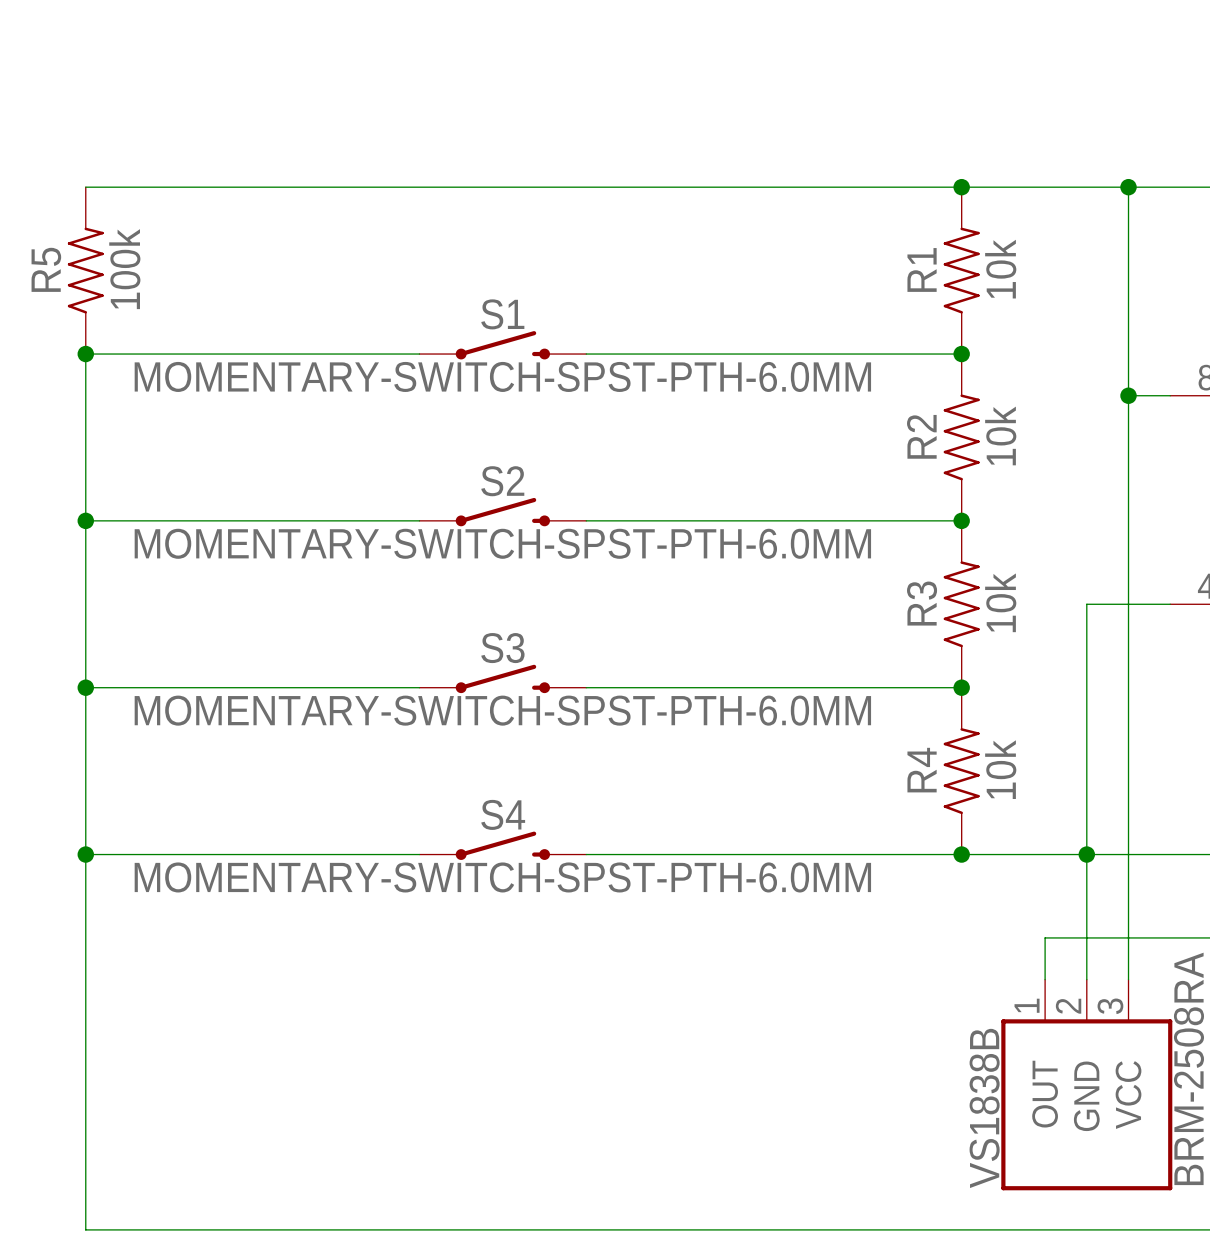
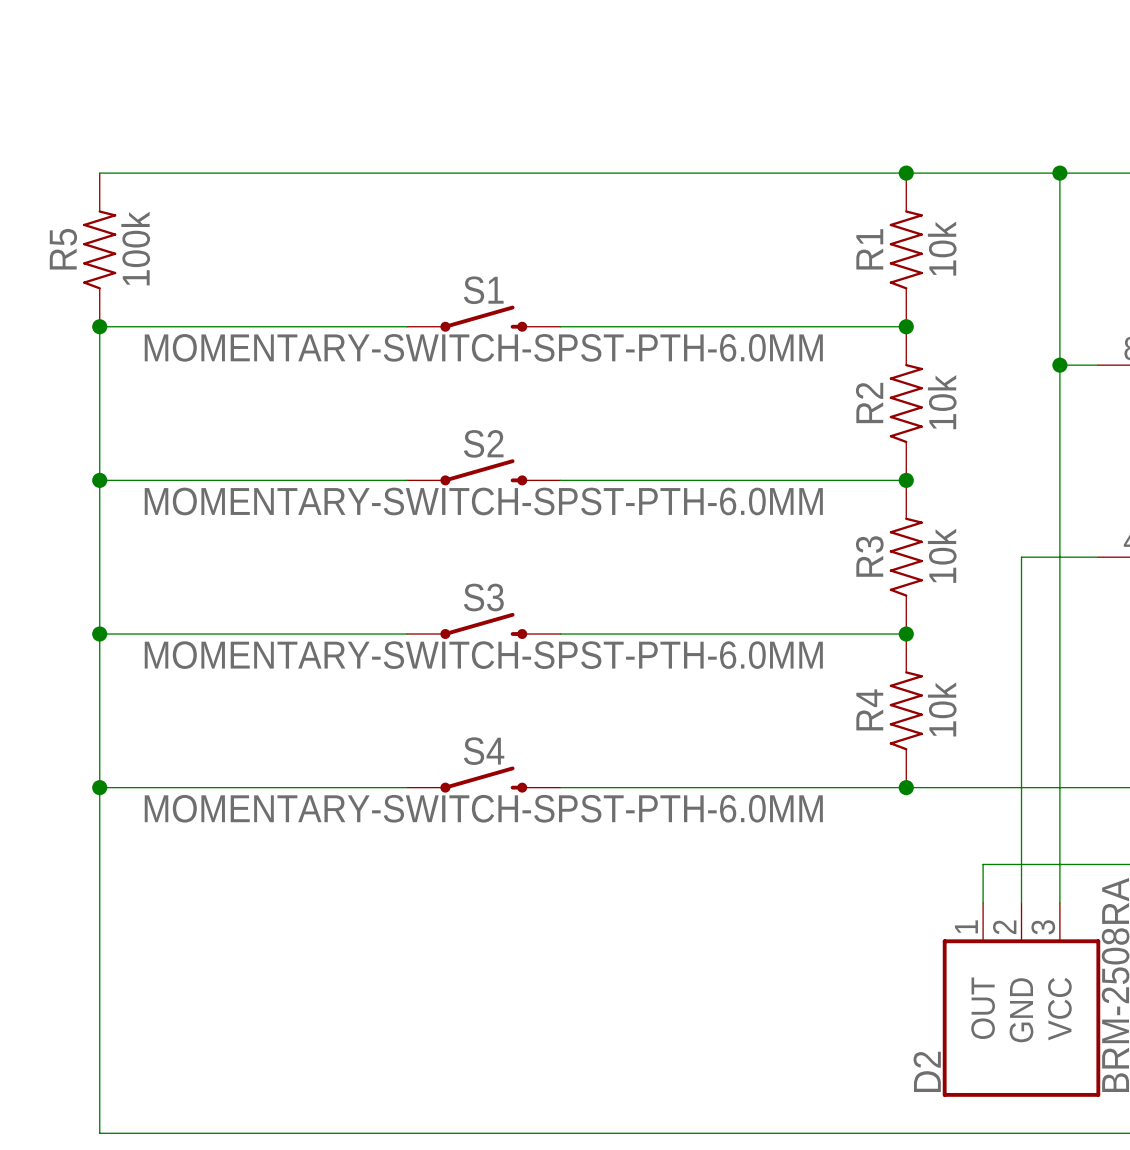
junction: (1086, 854) -> none
VS1838B name: VS1838B (984, 1108) -> D2 (927, 1071)

